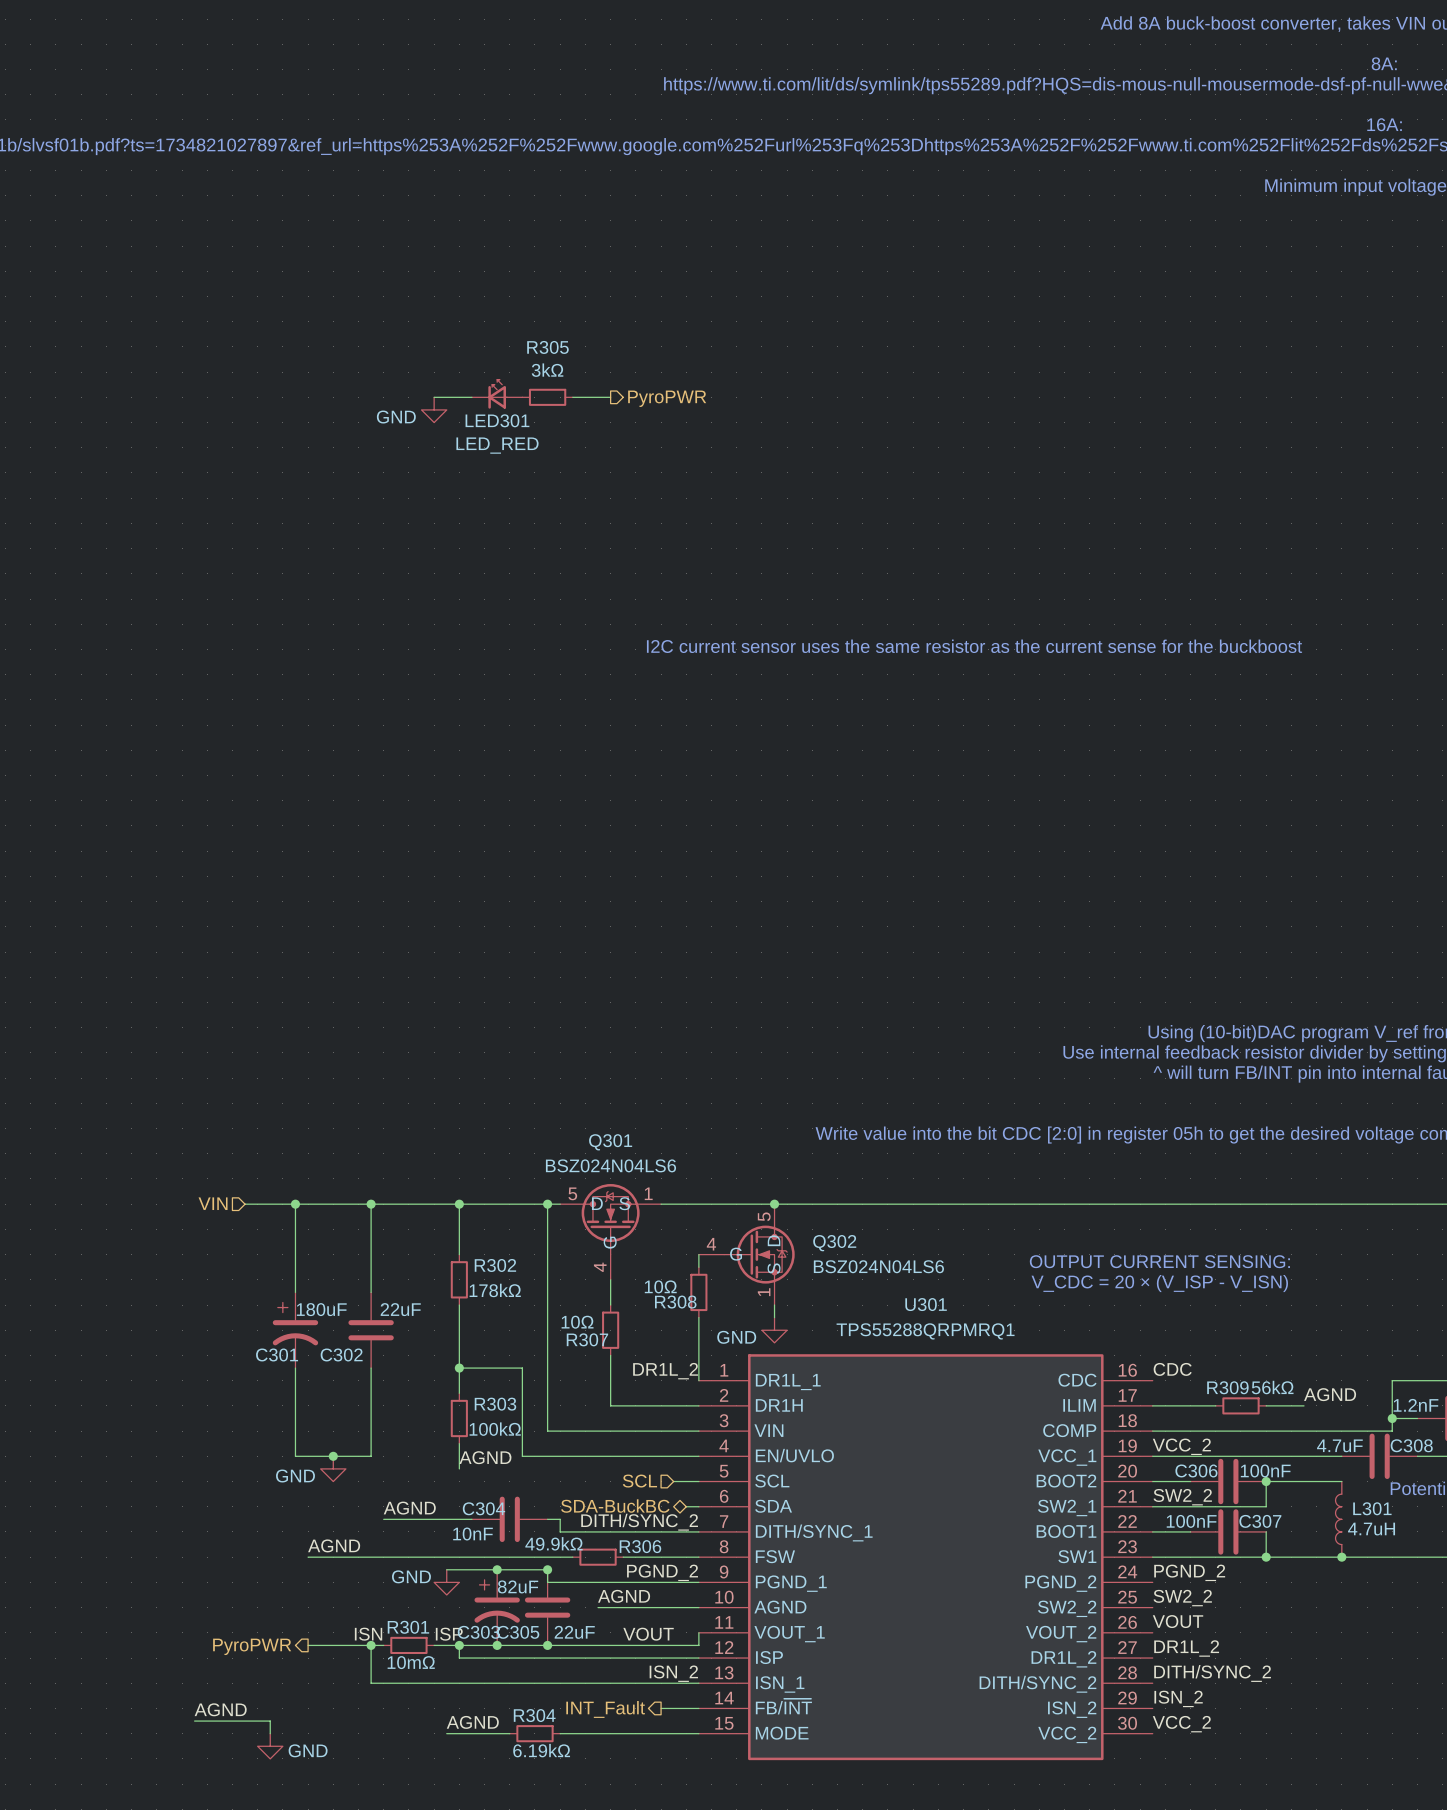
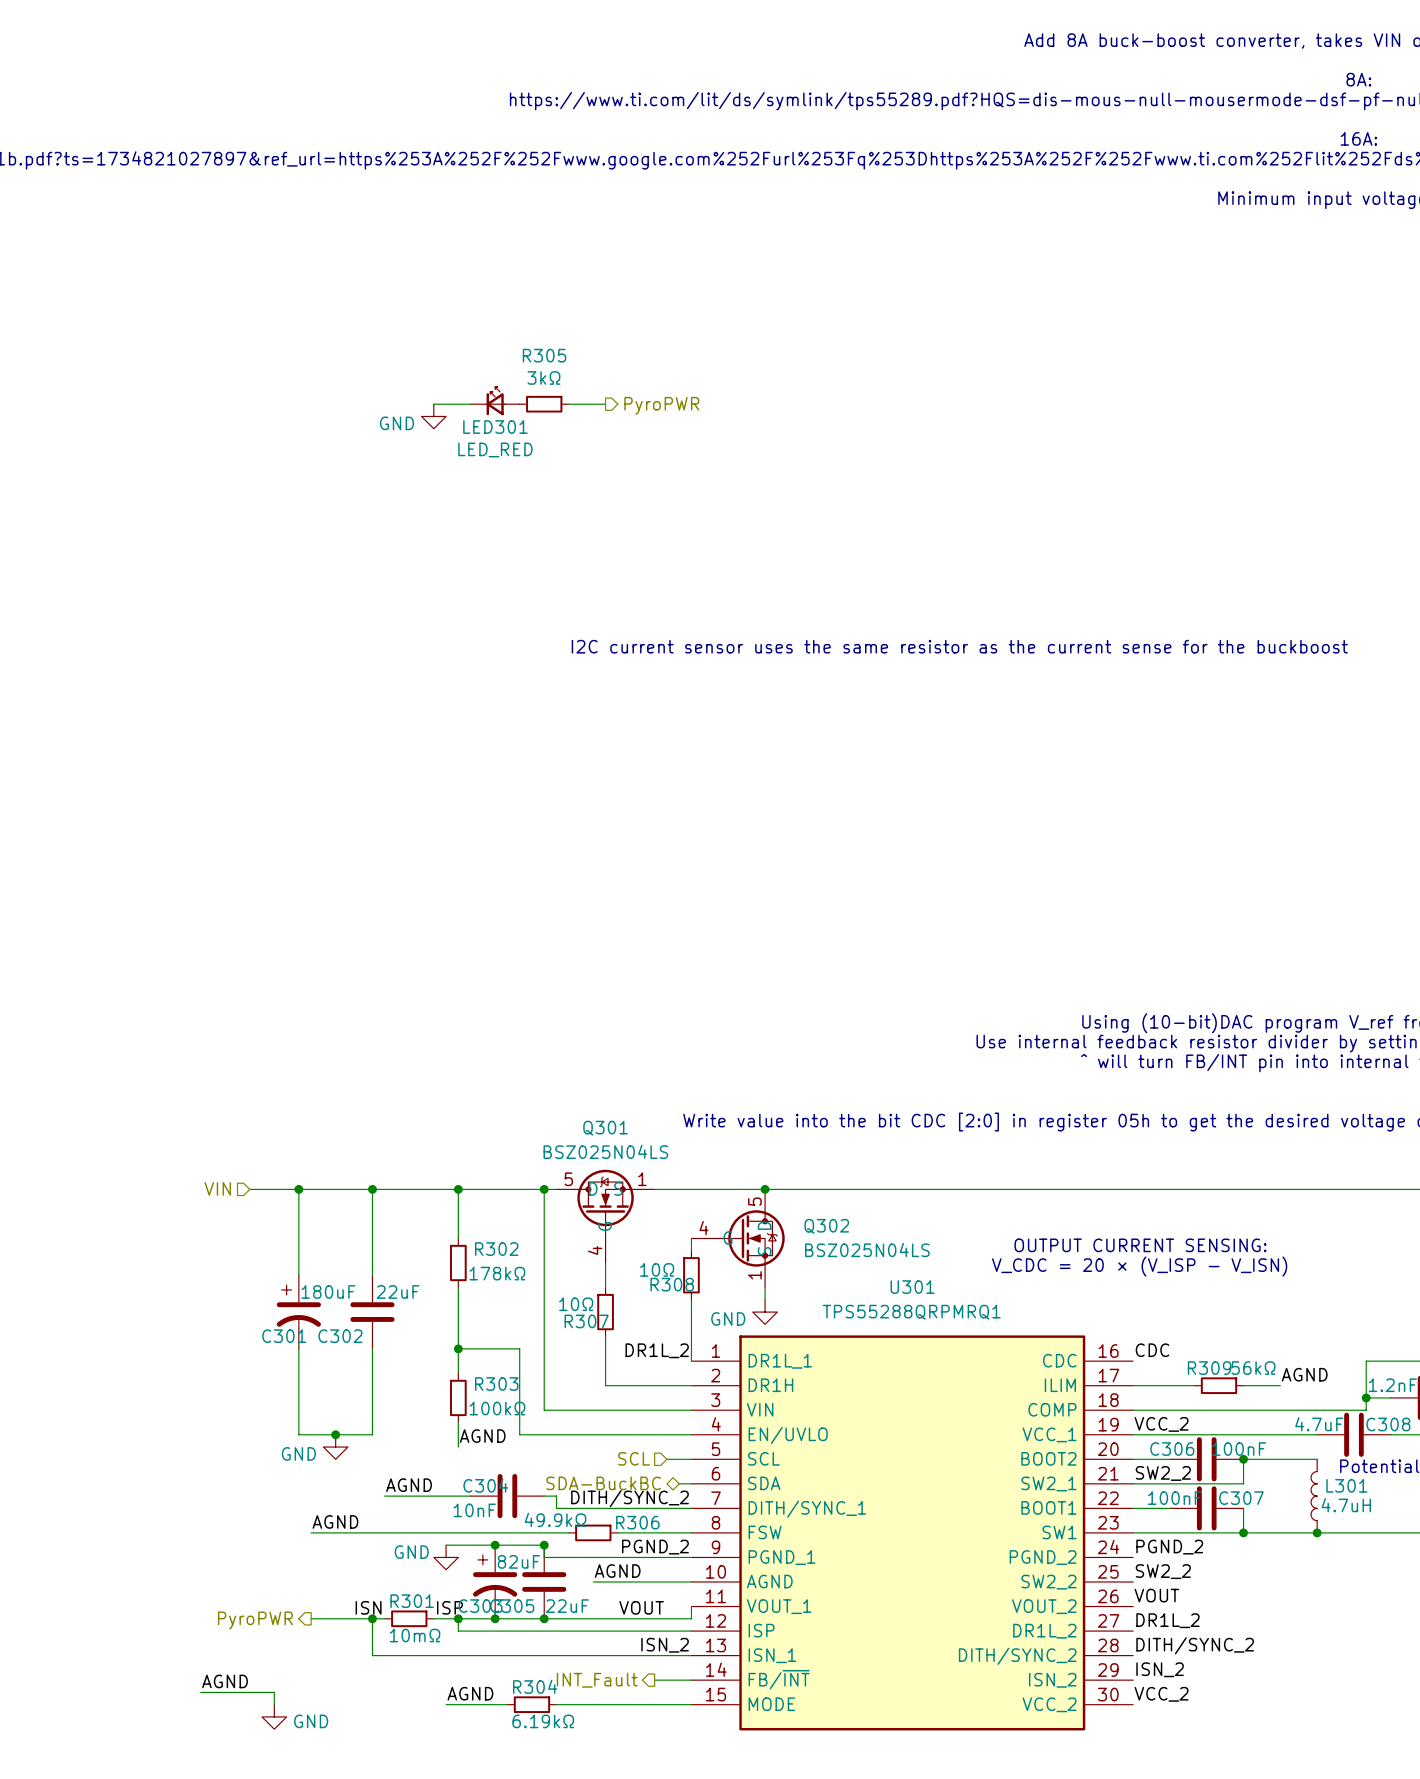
Q301 value: BSZ024N04LS6 (610, 1165) -> BSZ025N04LS (605, 1151)
Q302 value: BSZ024N04LS6 (878, 1266) -> BSZ025N04LS (867, 1249)

